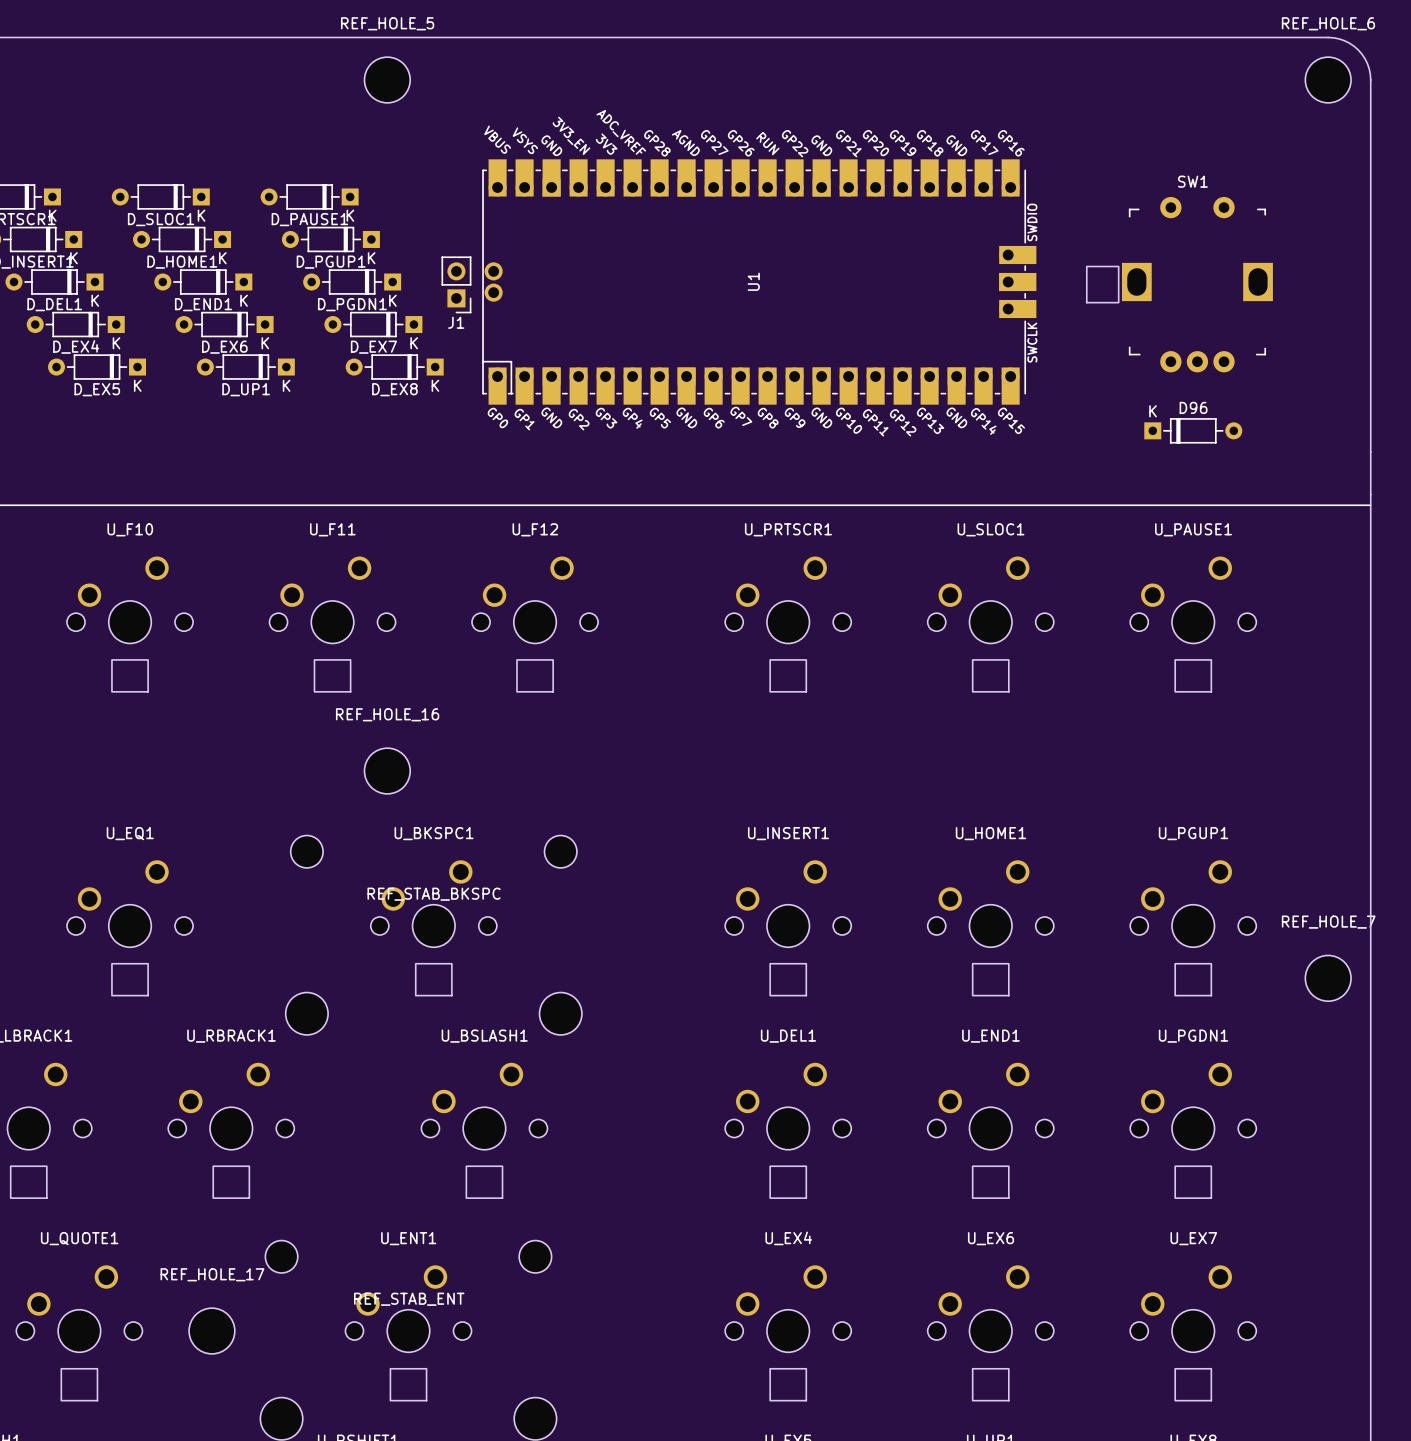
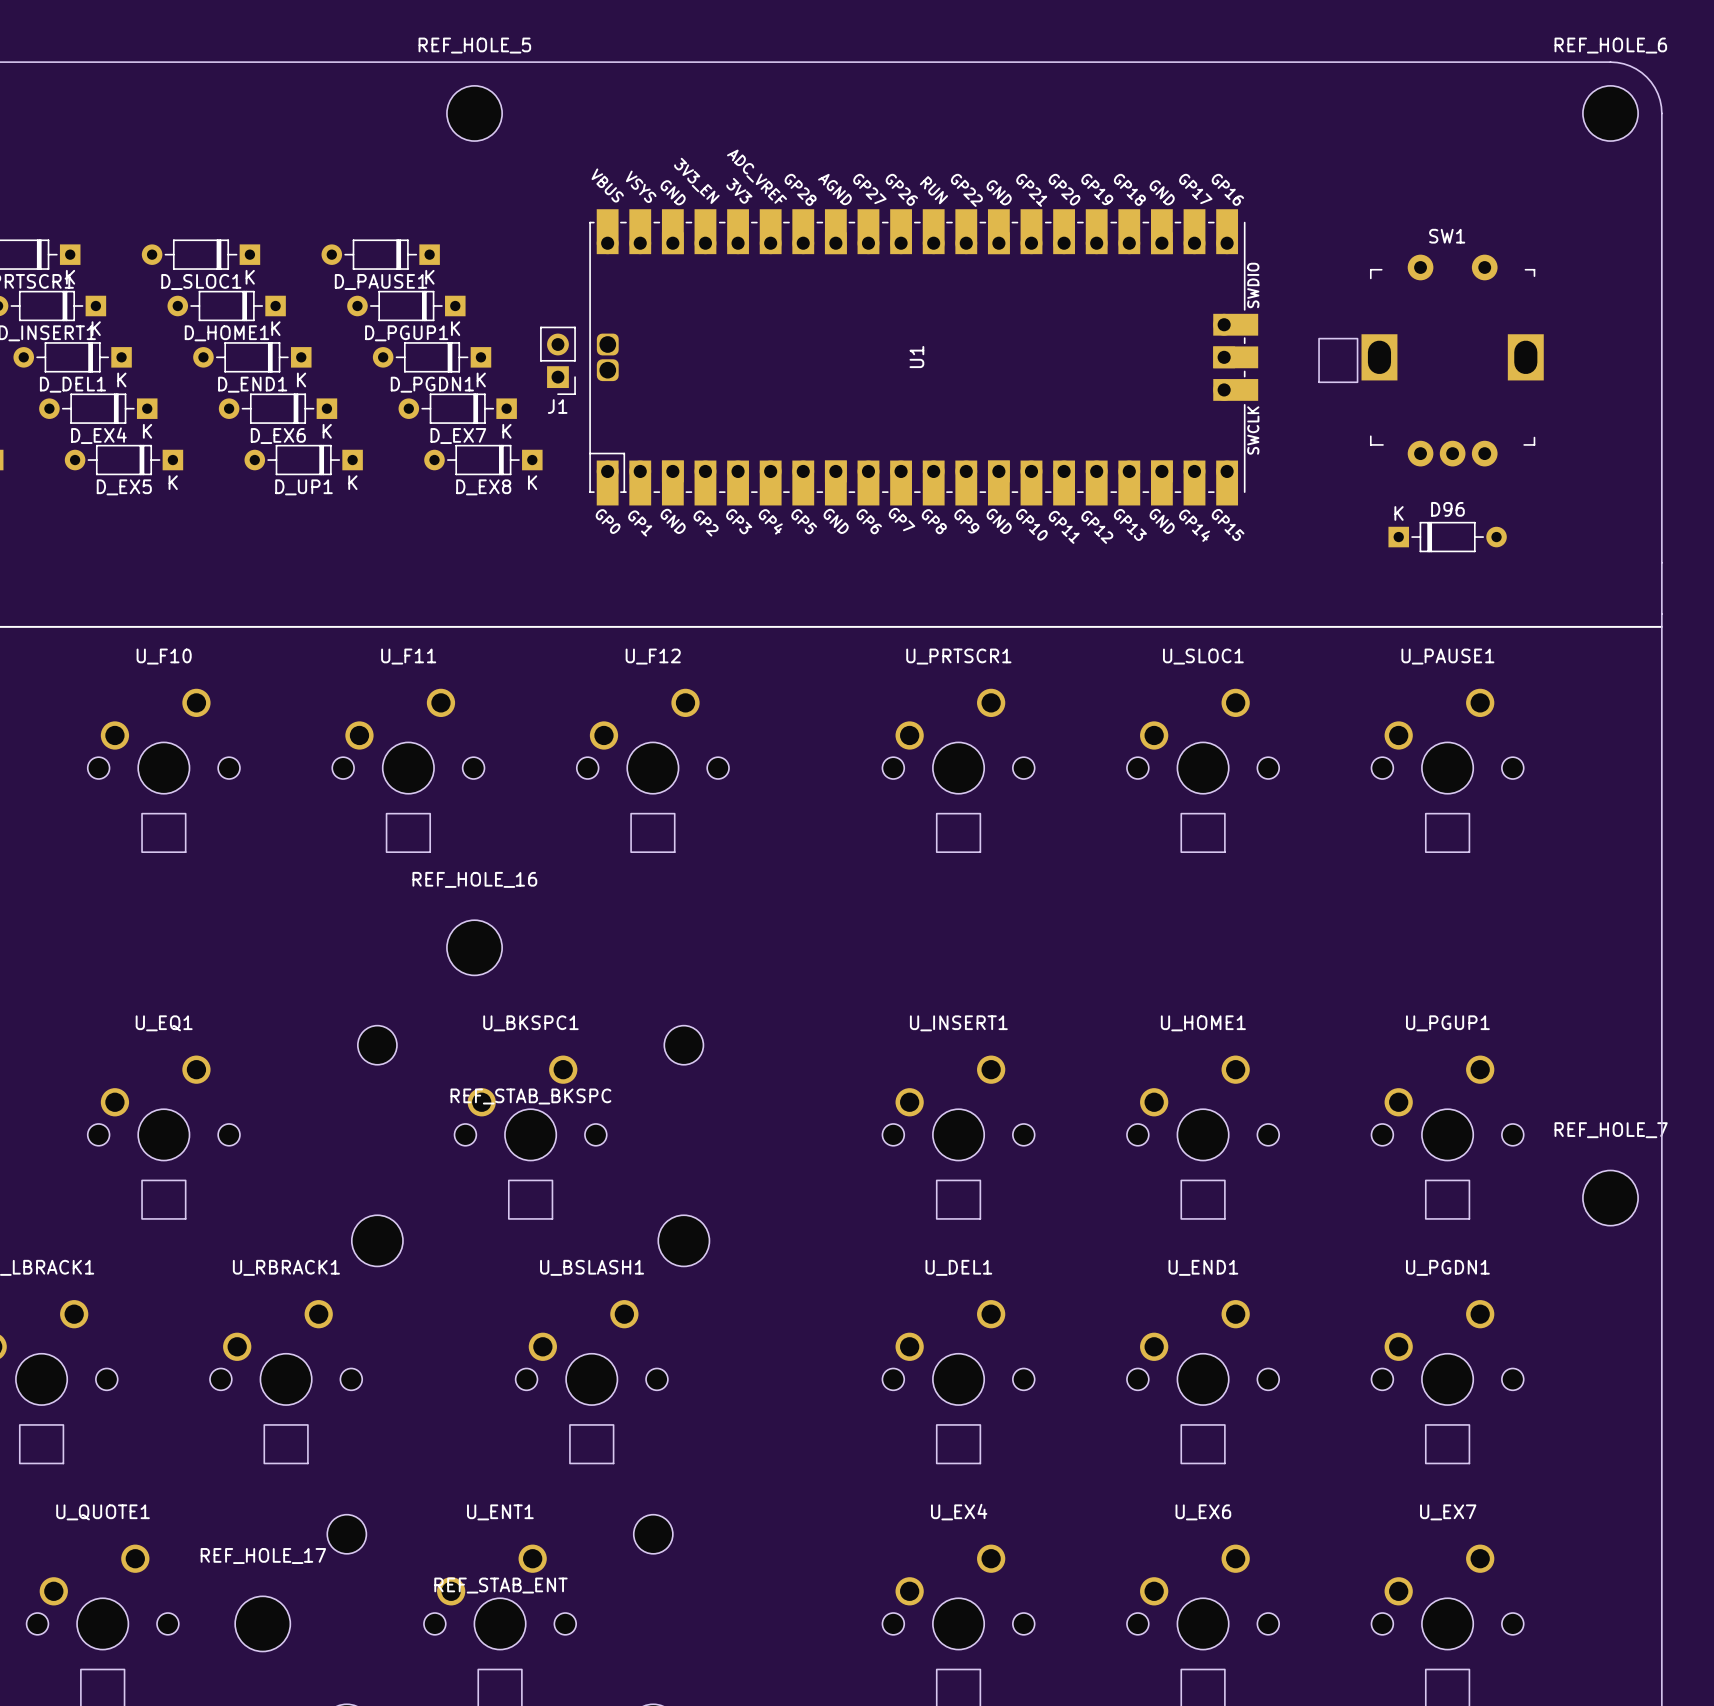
U1 footprint: [482, 159, 1037, 405] -> [589, 209, 1259, 506]

